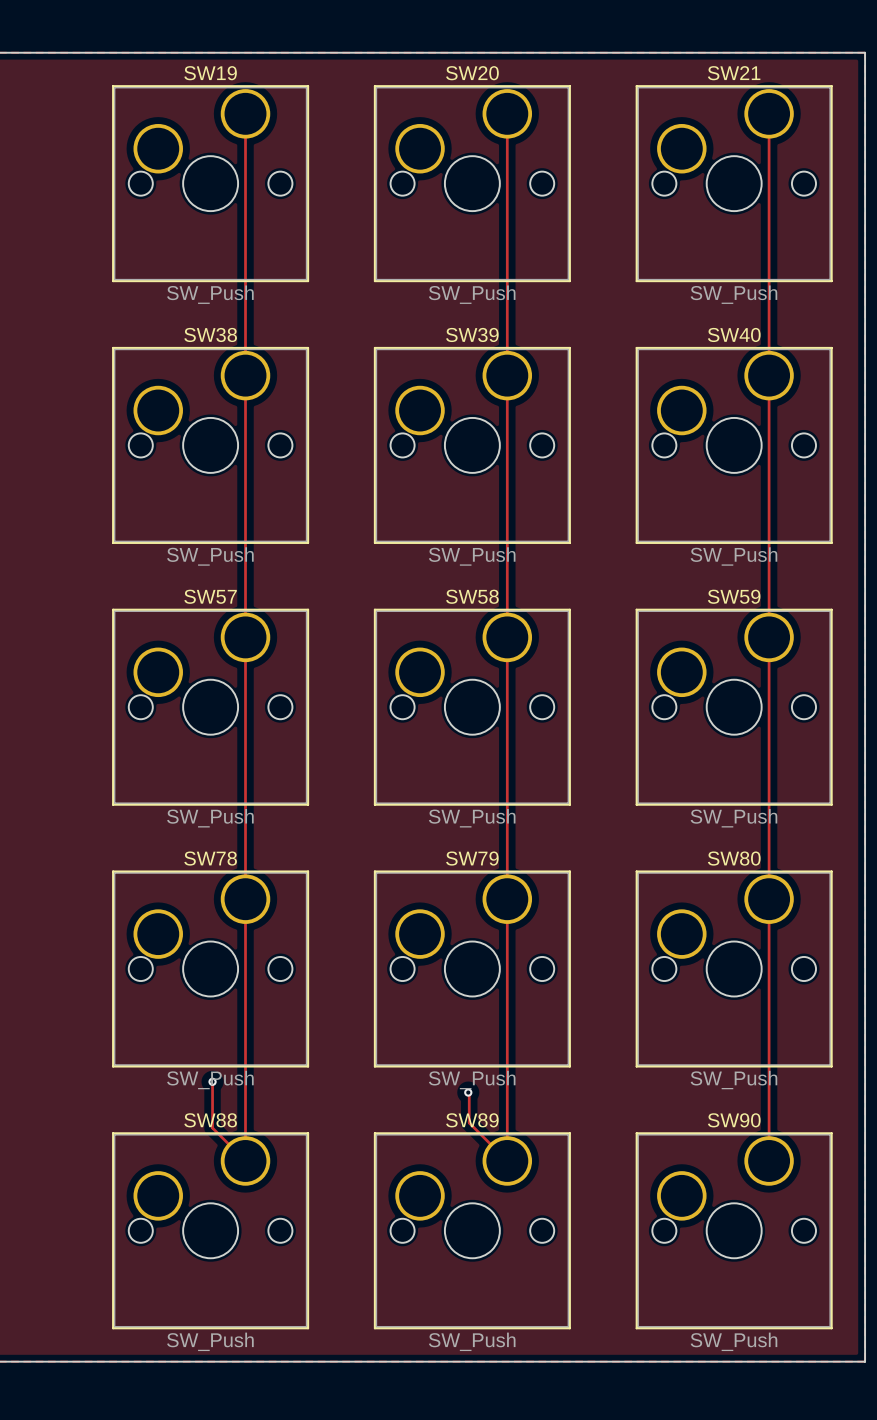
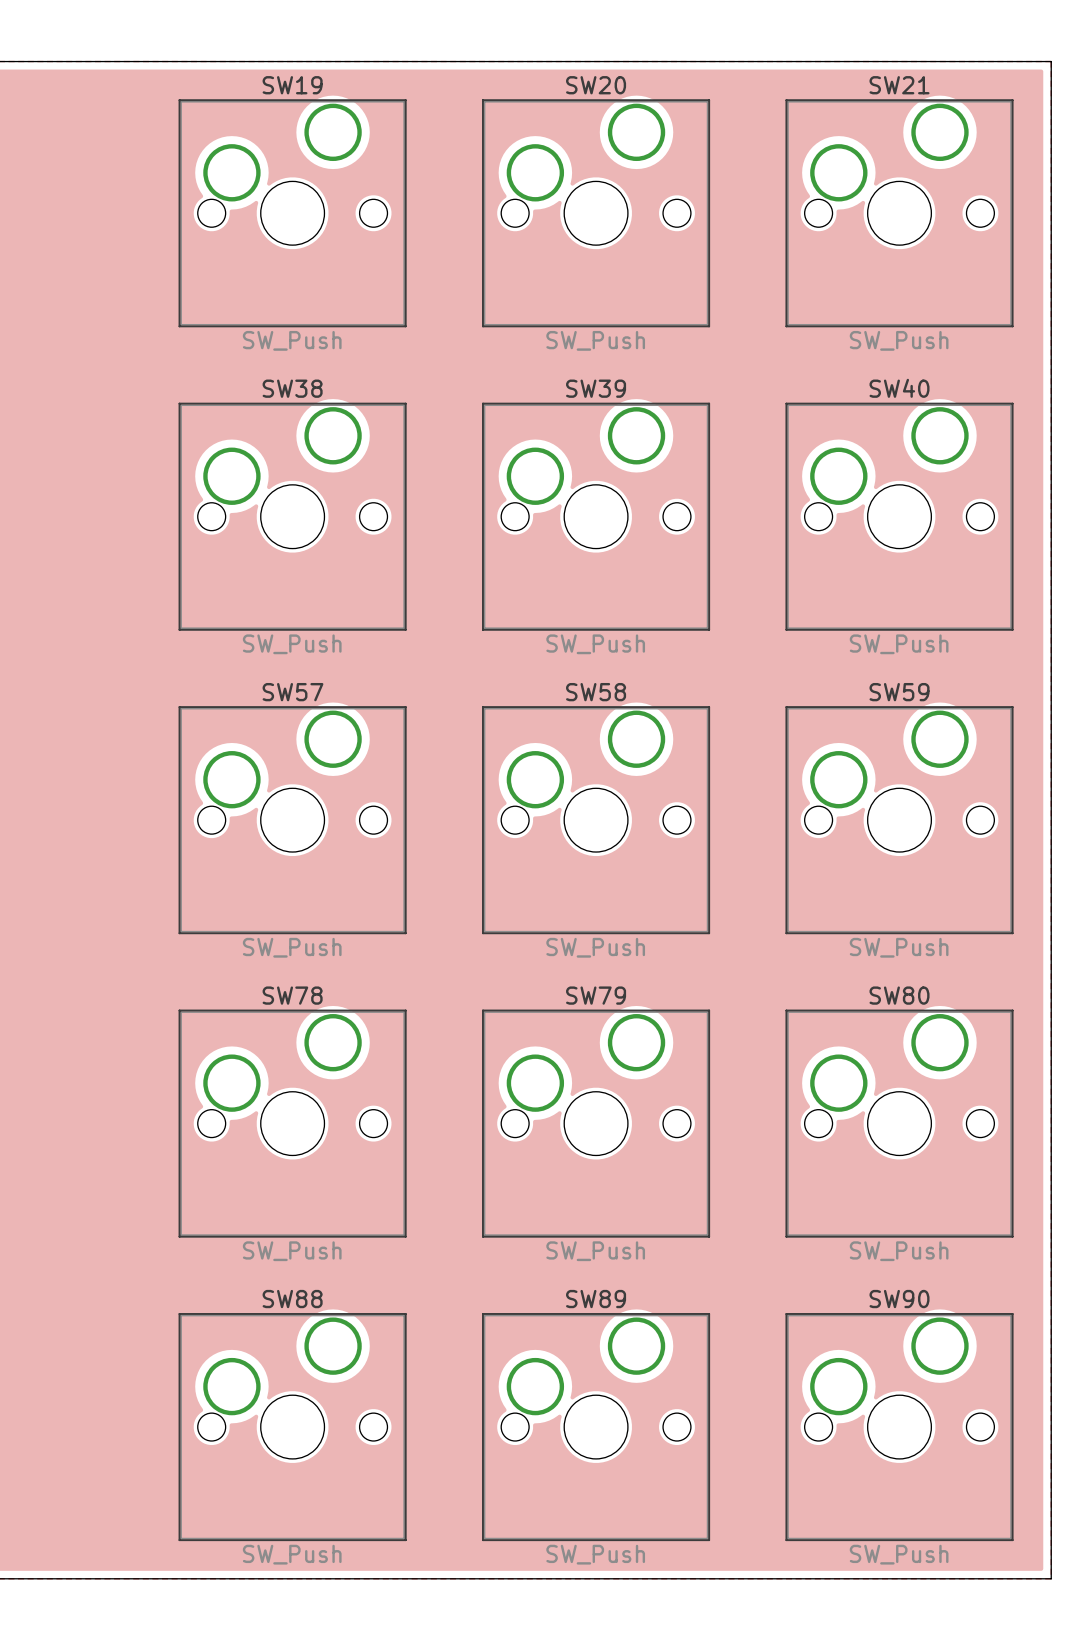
track: (245, 113) (245, 1160) (212, 1128) (212, 1081) -> none
track: (507, 113) (507, 1160) (469, 1122) (468, 1092) -> none
track: (769, 113) (769, 1160) -> none
via: (212, 1081) -> none
via: (468, 1092) -> none

